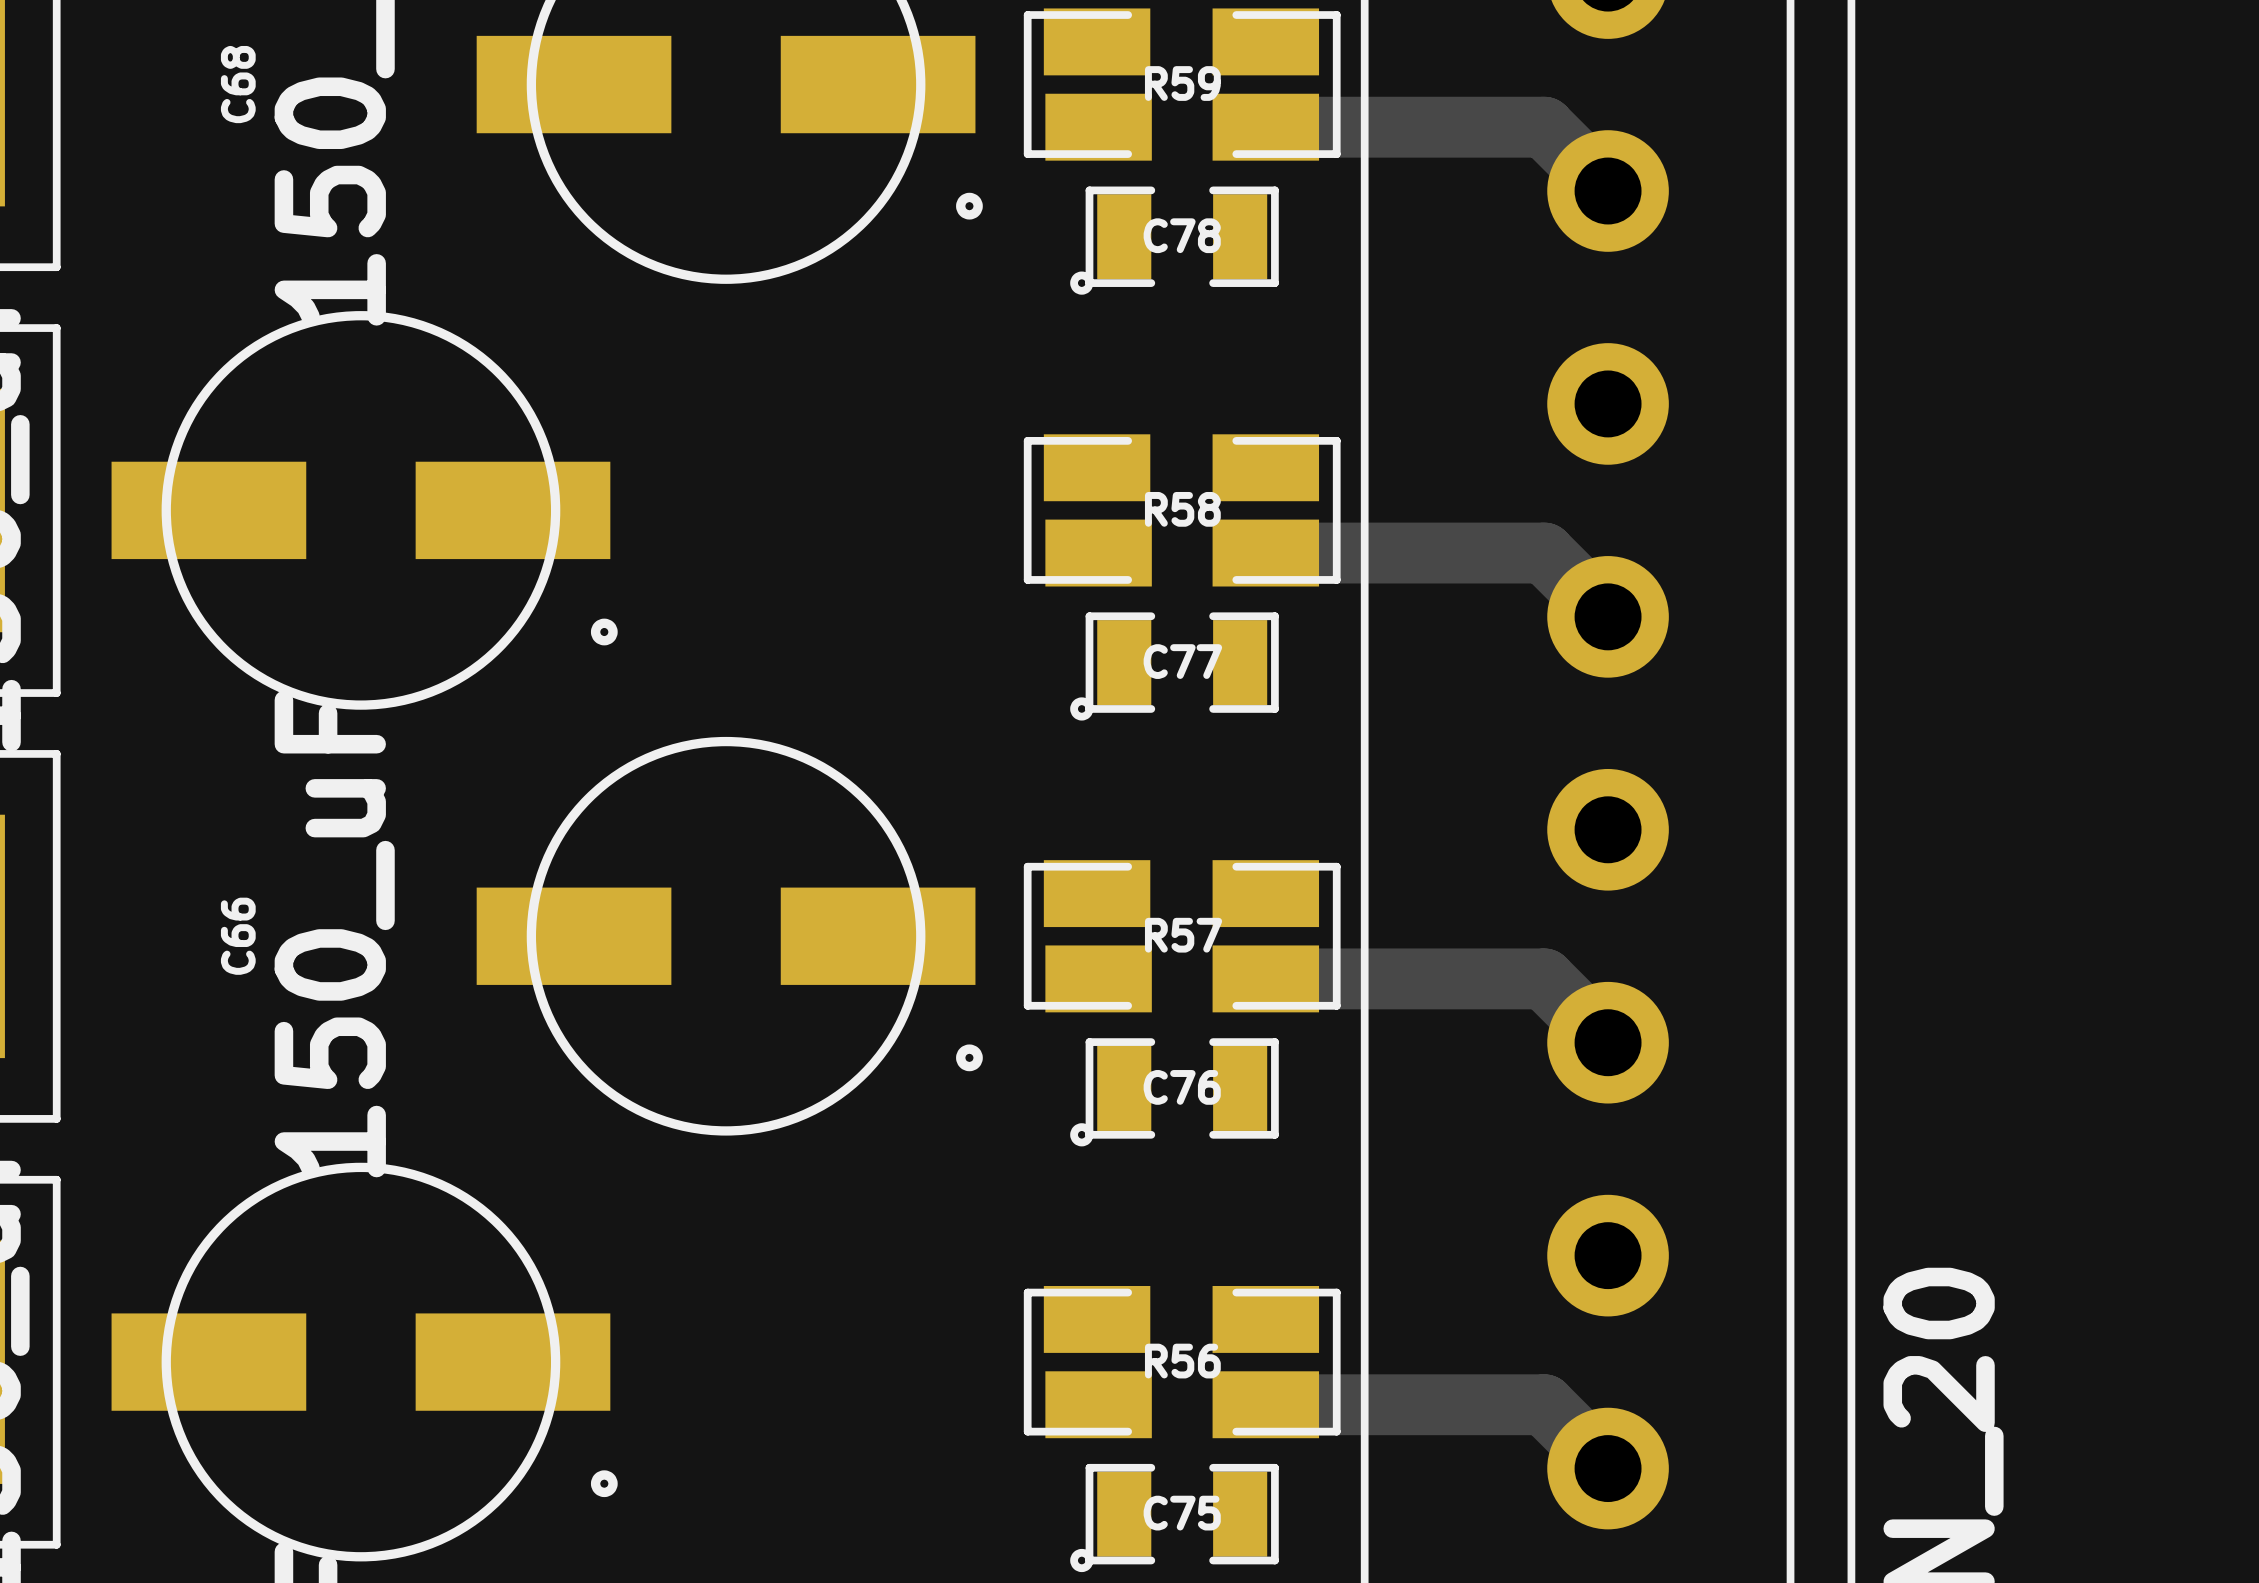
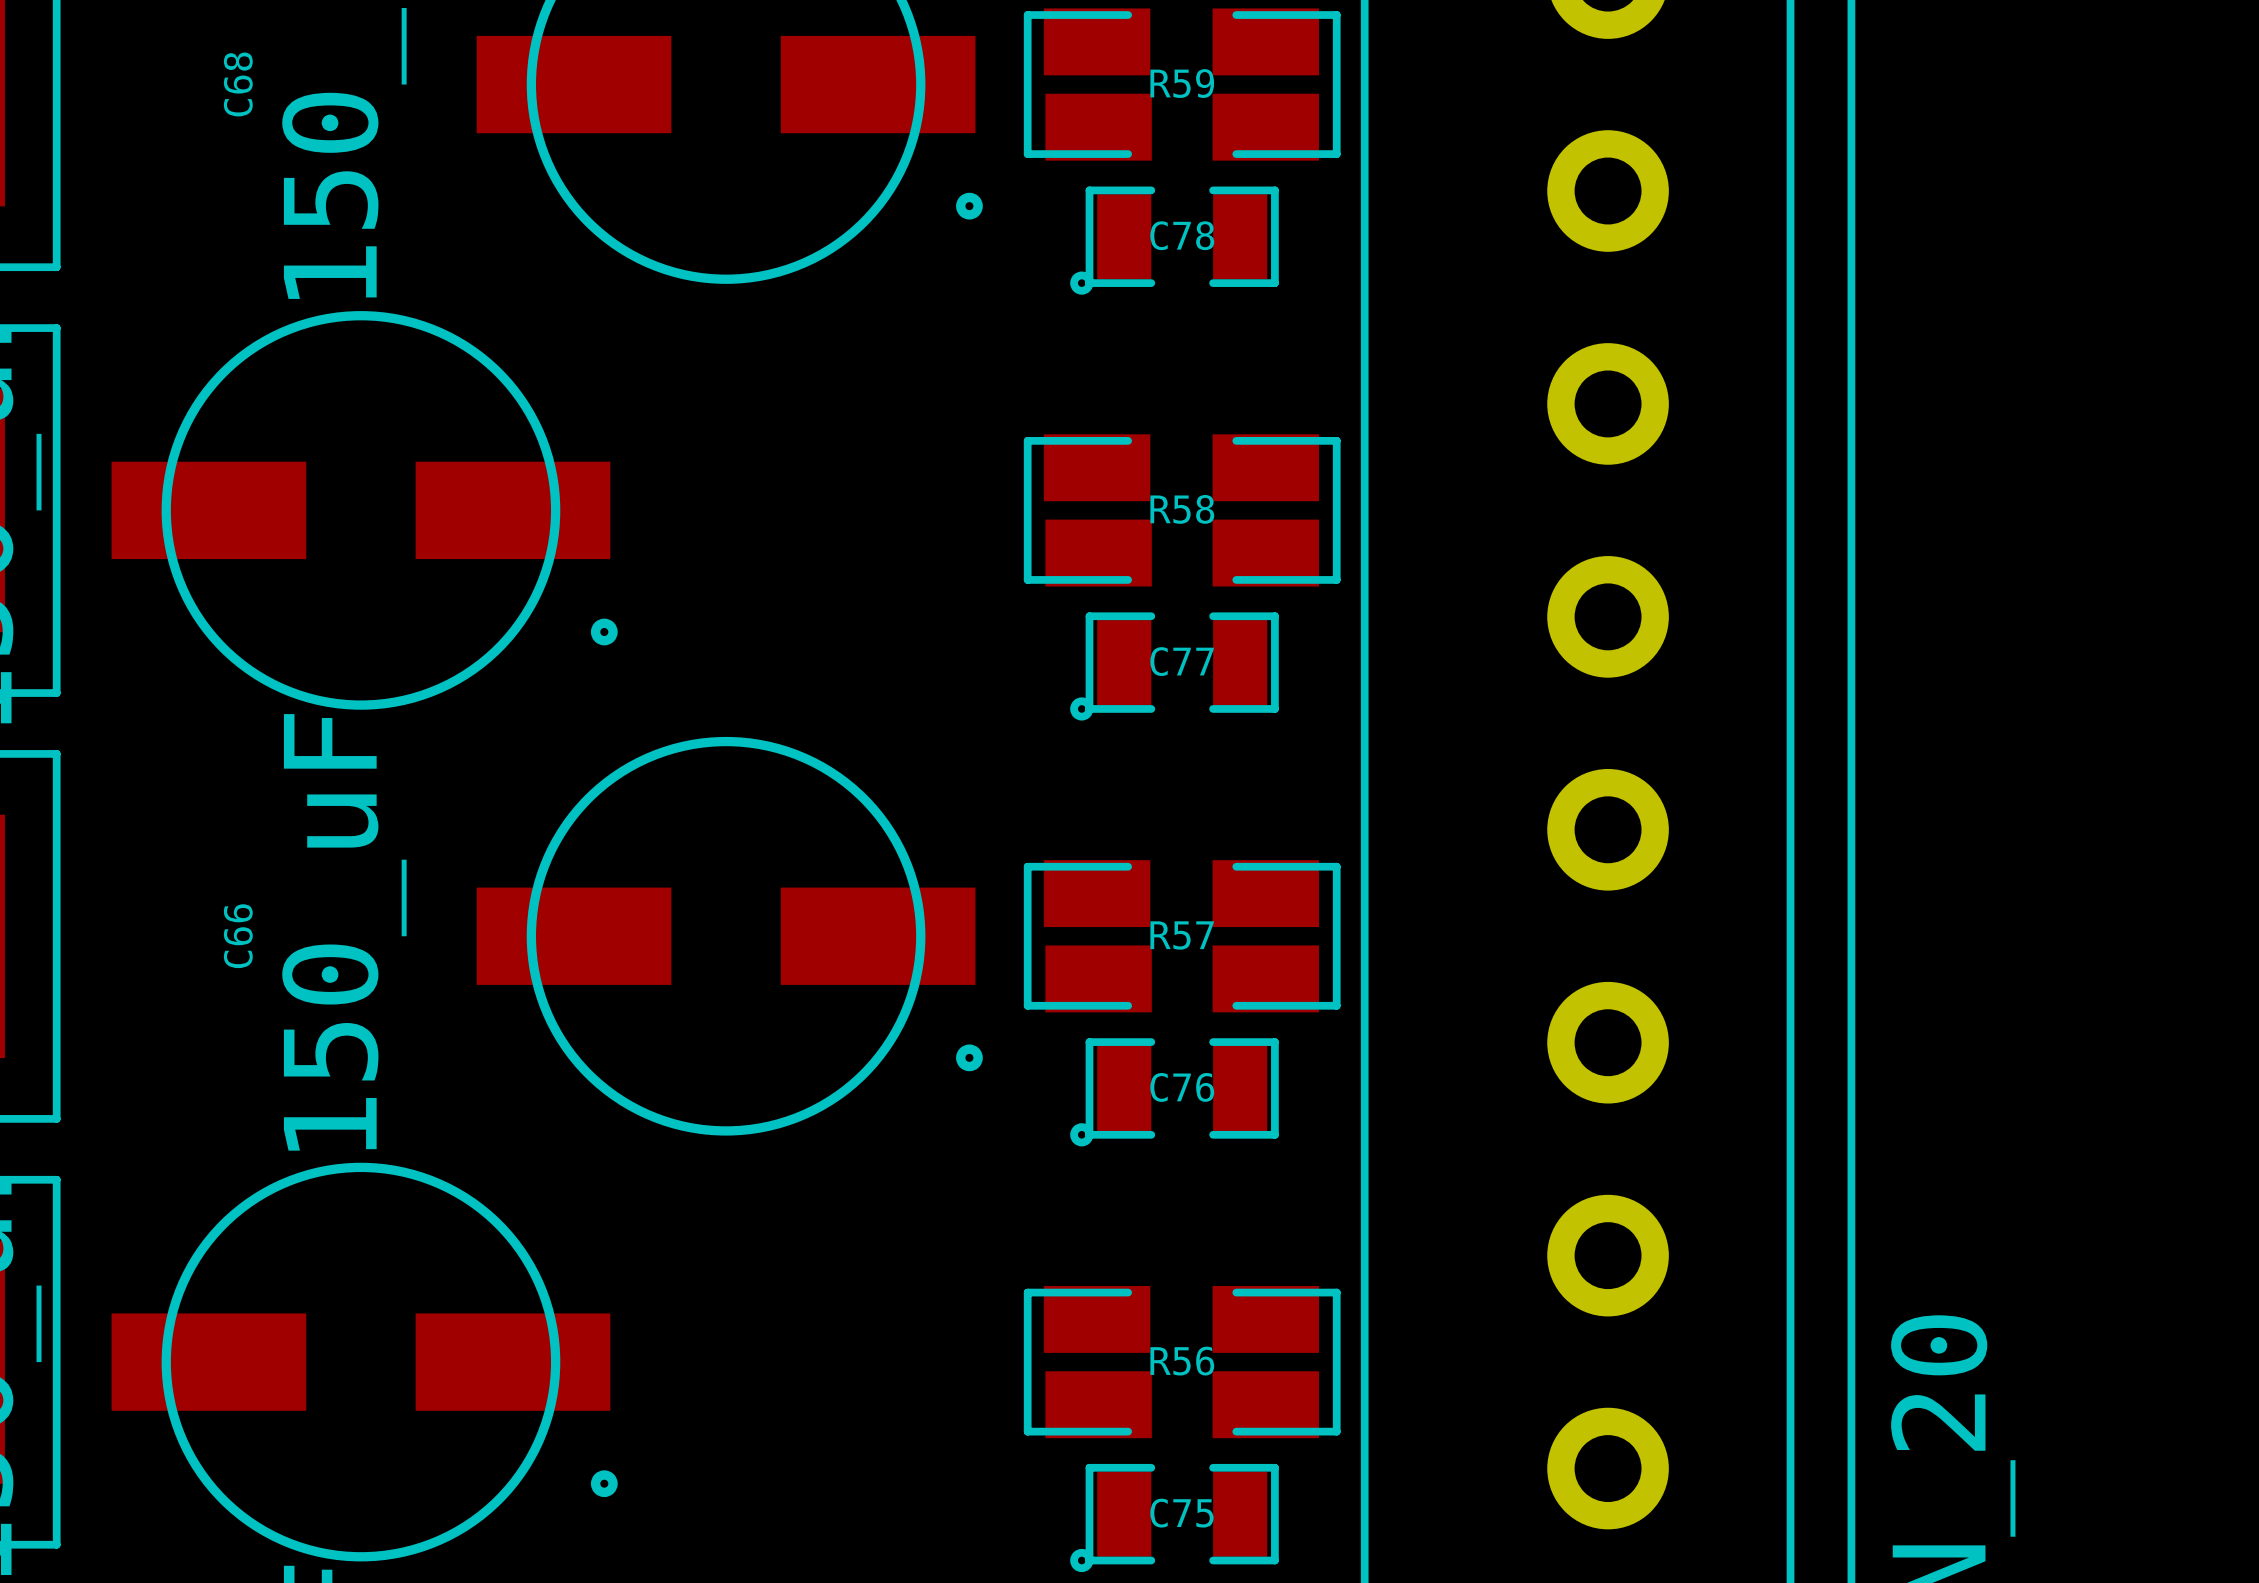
track: (1265, 127) (1544, 127) (1608, 191) -> none
track: (1265, 553) (1544, 553) (1608, 616) -> none
track: (1265, 978) (1544, 978) (1608, 1042) -> none
track: (1265, 1404) (1544, 1404) (1608, 1468) -> none

